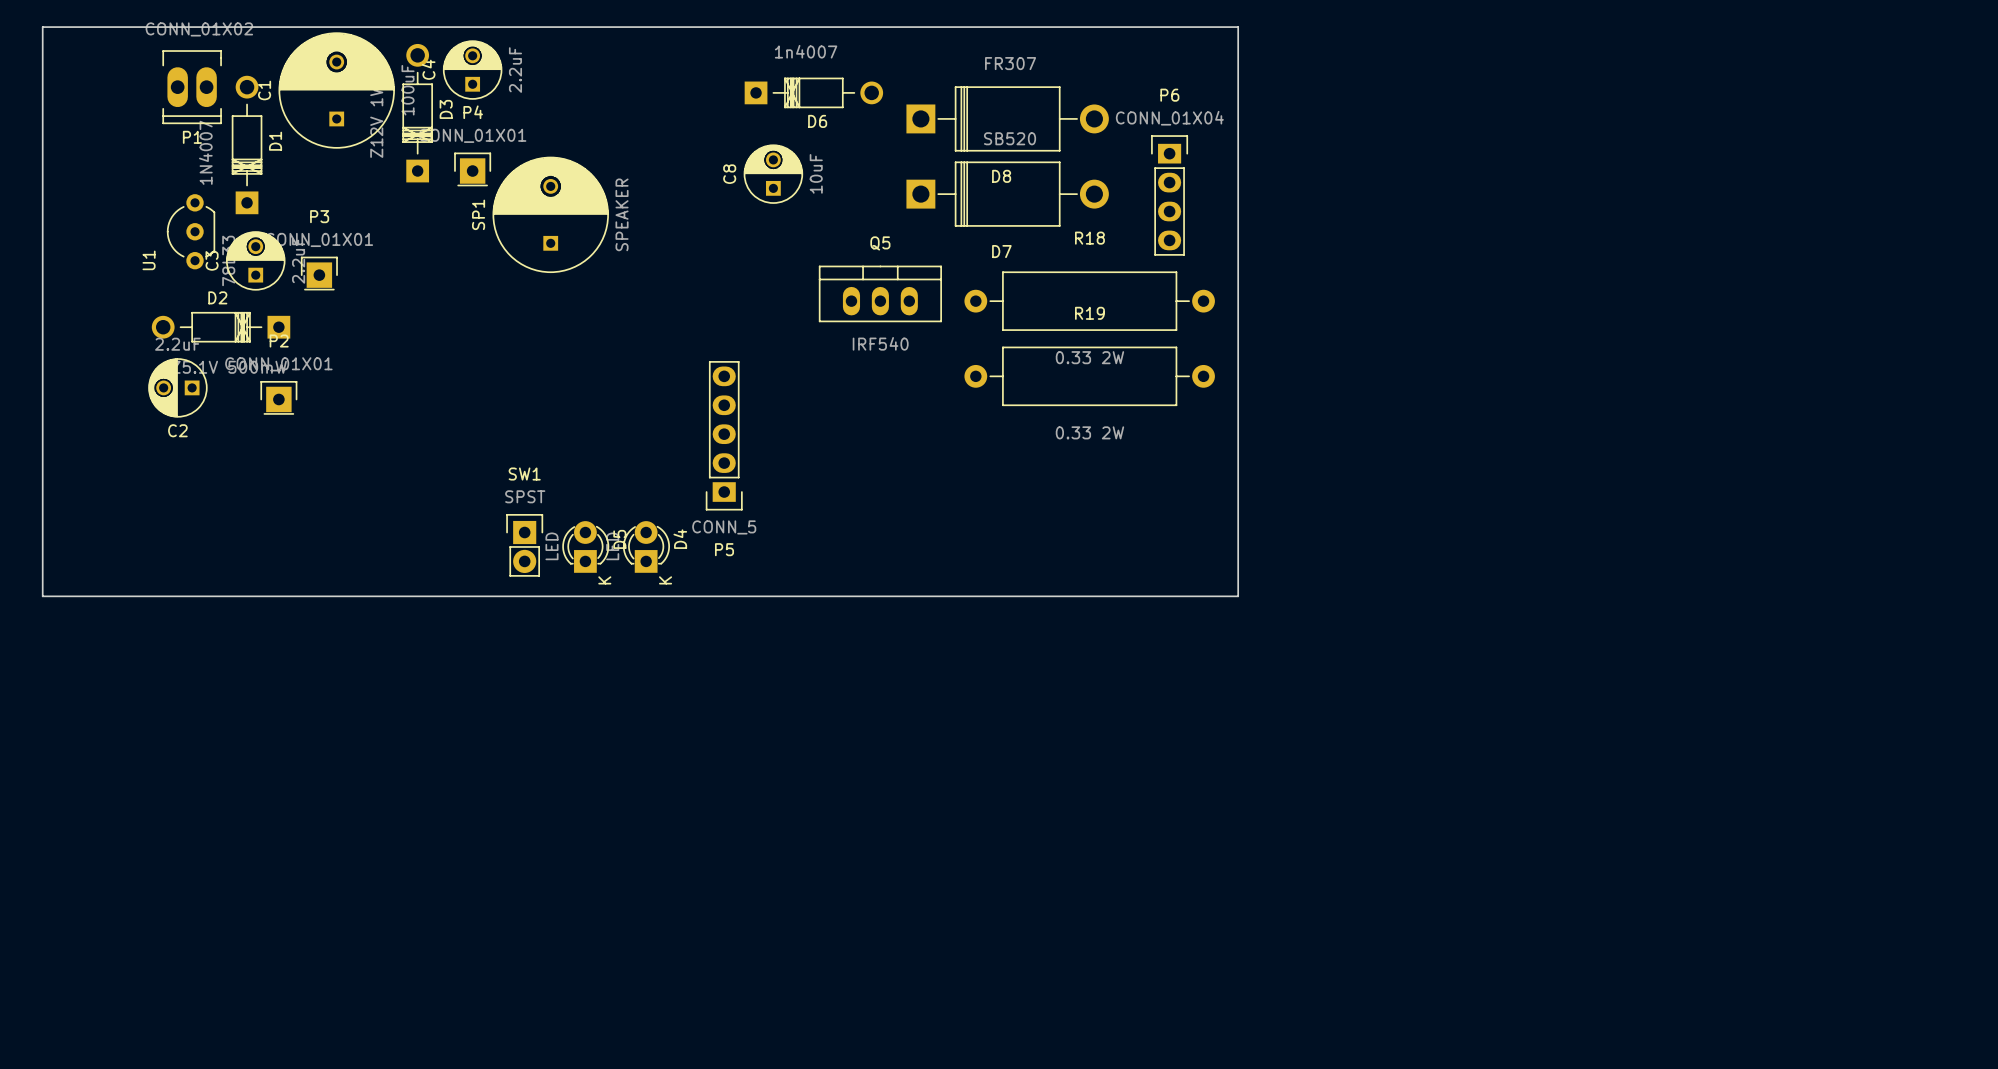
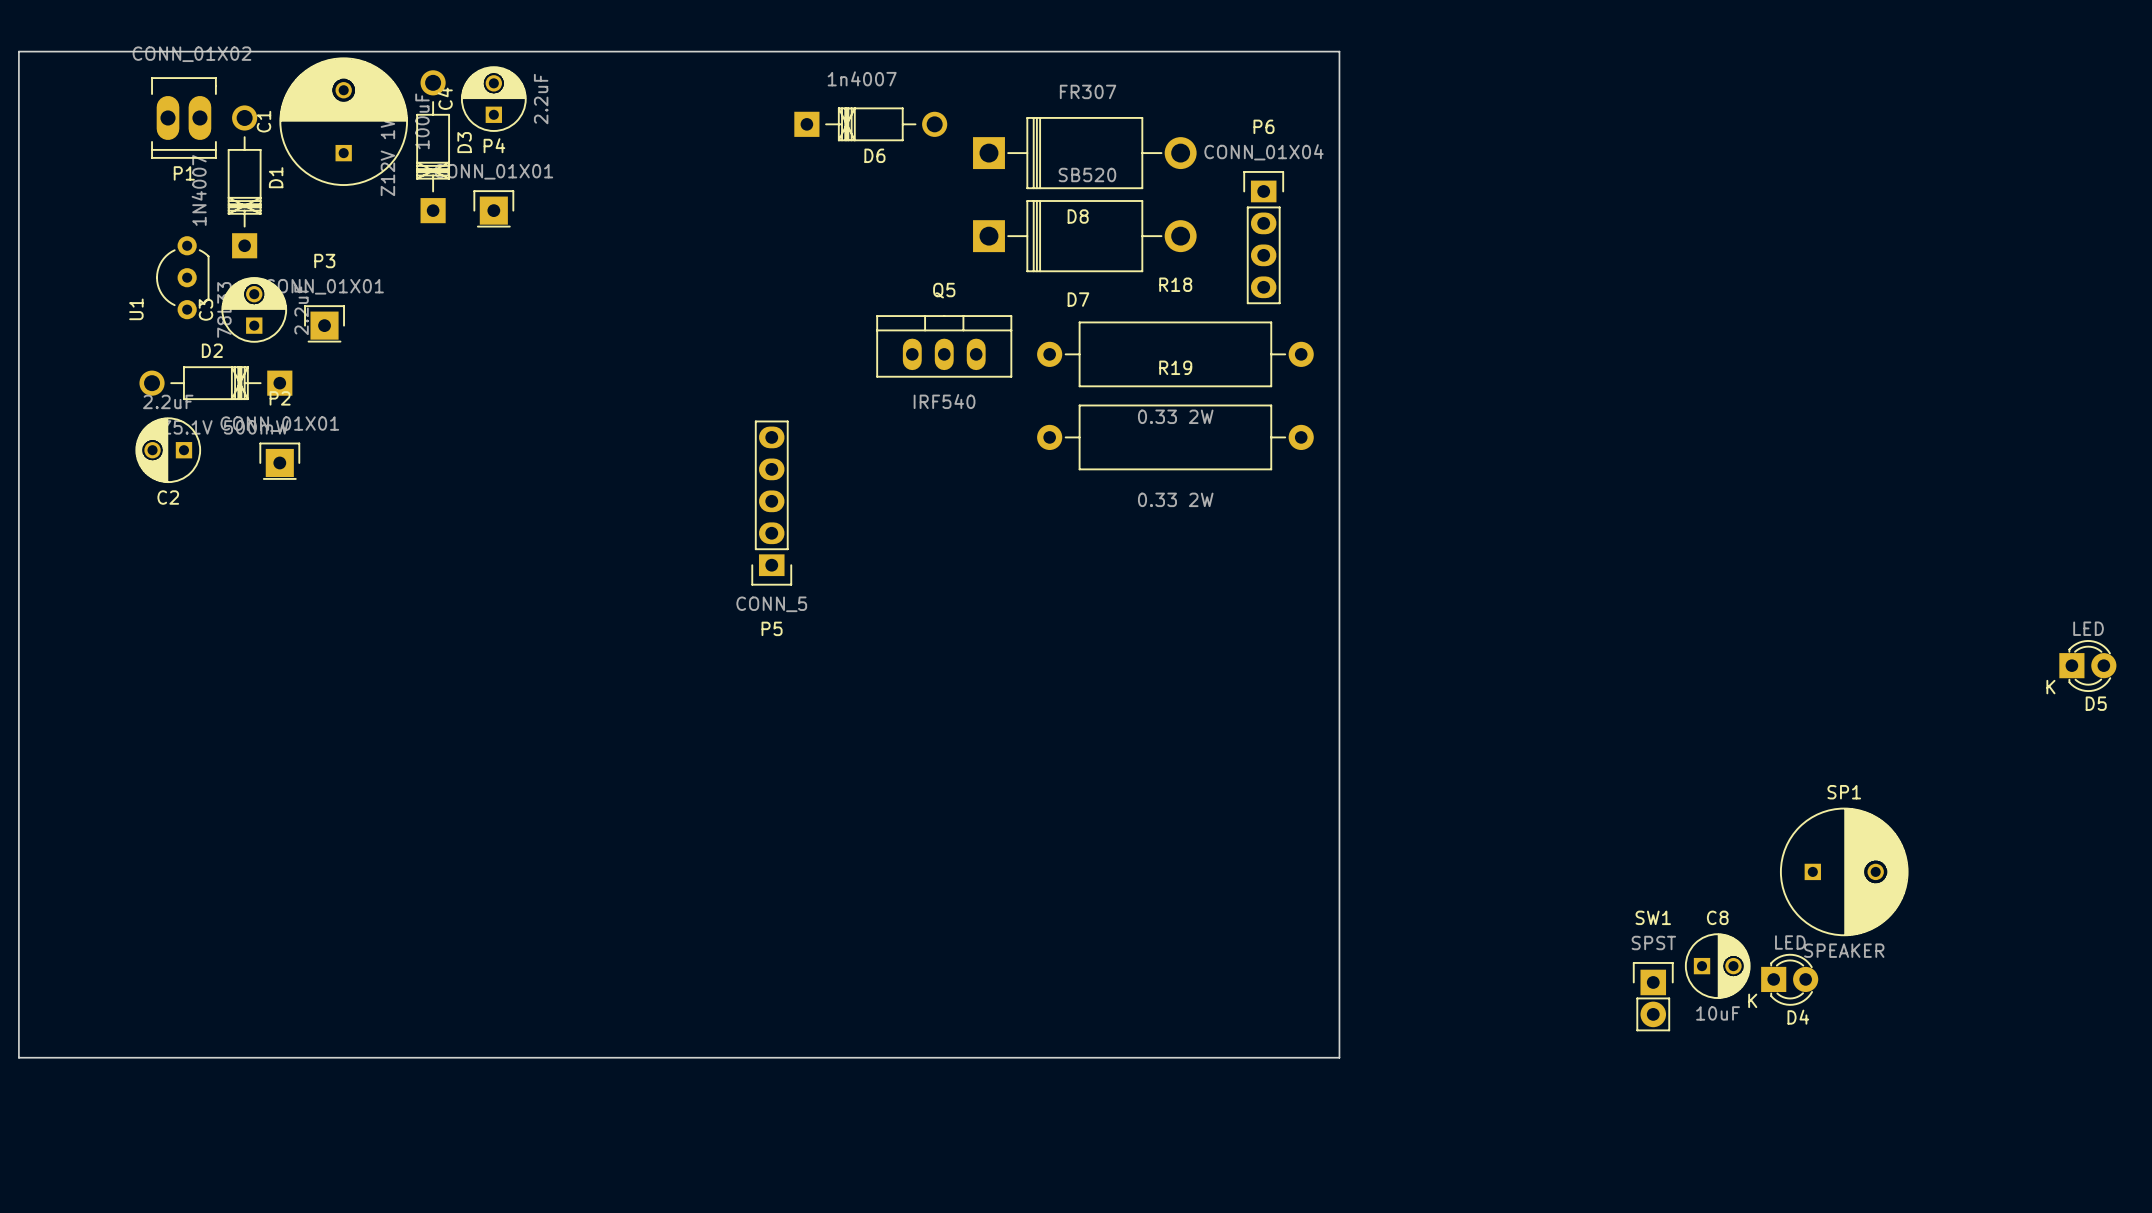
C8 rotation: 0° (773, 174) -> 90° clockwise (1717, 966)
C8 position: (773, 174) -> (1717, 966)
SP1 rotation: 0° (550, 214) -> 90° clockwise (1844, 871)
SP1 position: (550, 214) -> (1844, 871)
SW1 position: (524, 545) -> (1653, 996)
D5 rotation: 0° (585, 546) -> 90° clockwise (2087, 666)
D5 position: (585, 546) -> (2087, 666)
D4 rotation: 0° (646, 546) -> 90° clockwise (1789, 979)
D4 position: (646, 546) -> (1789, 979)
board edge: (42, 596) (1238, 596) -> (18, 680) (18, 1057) (1339, 1057) (1339, 680)

